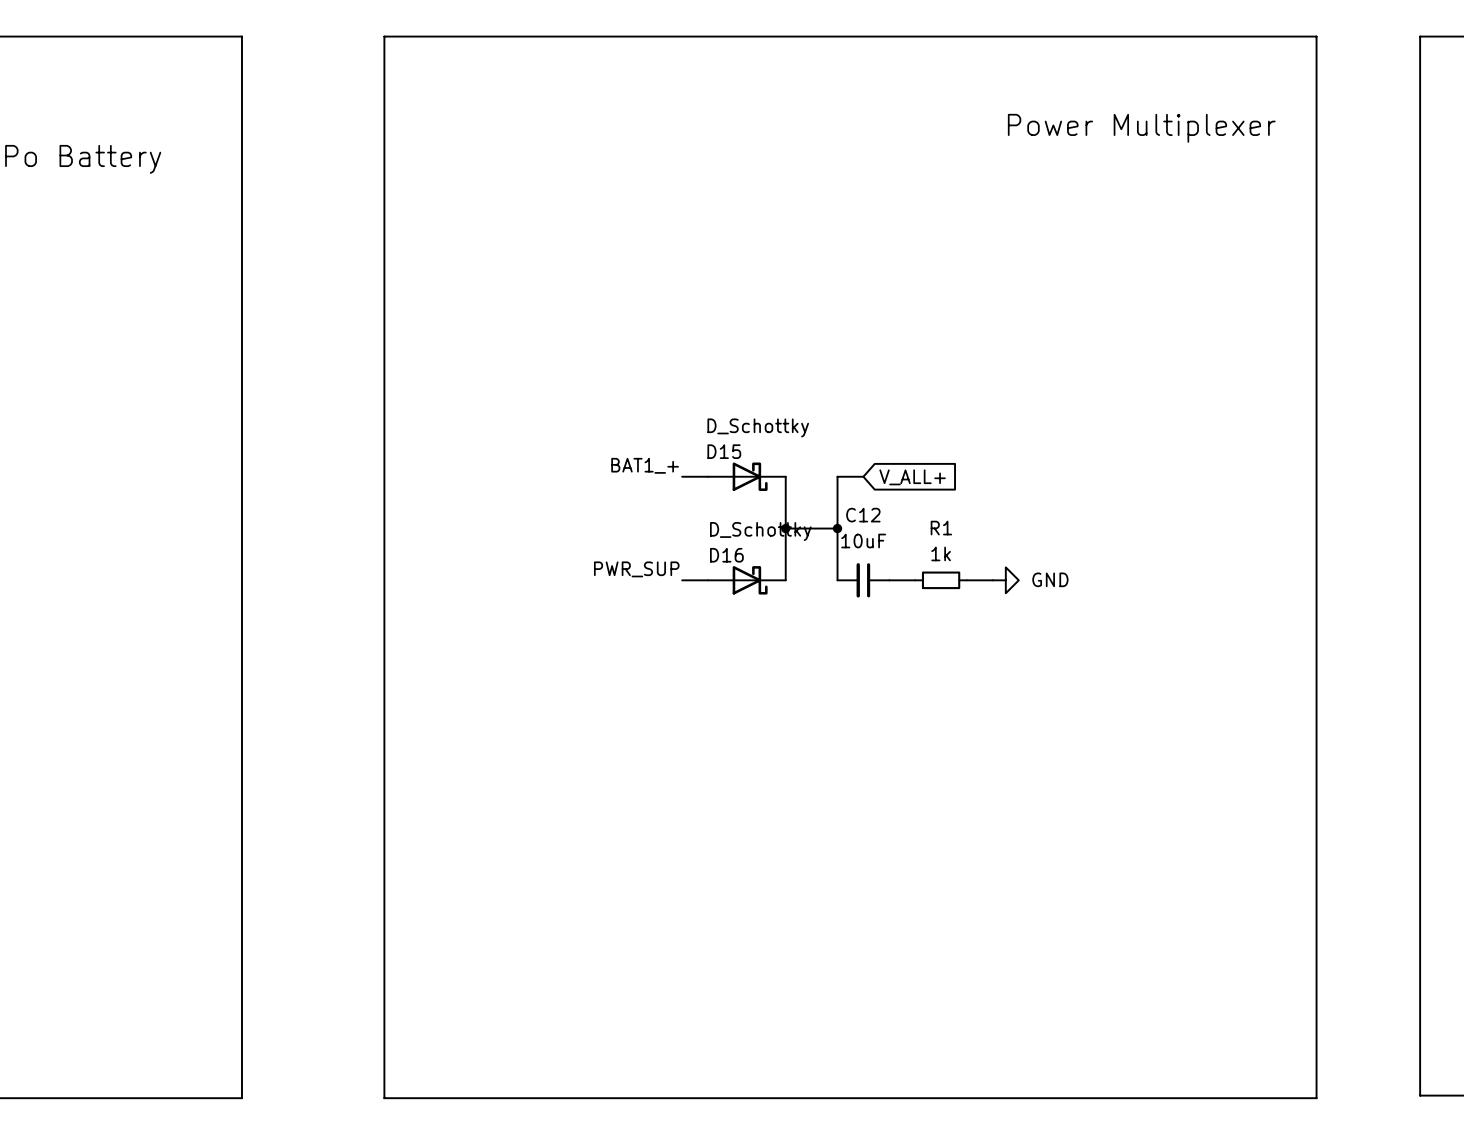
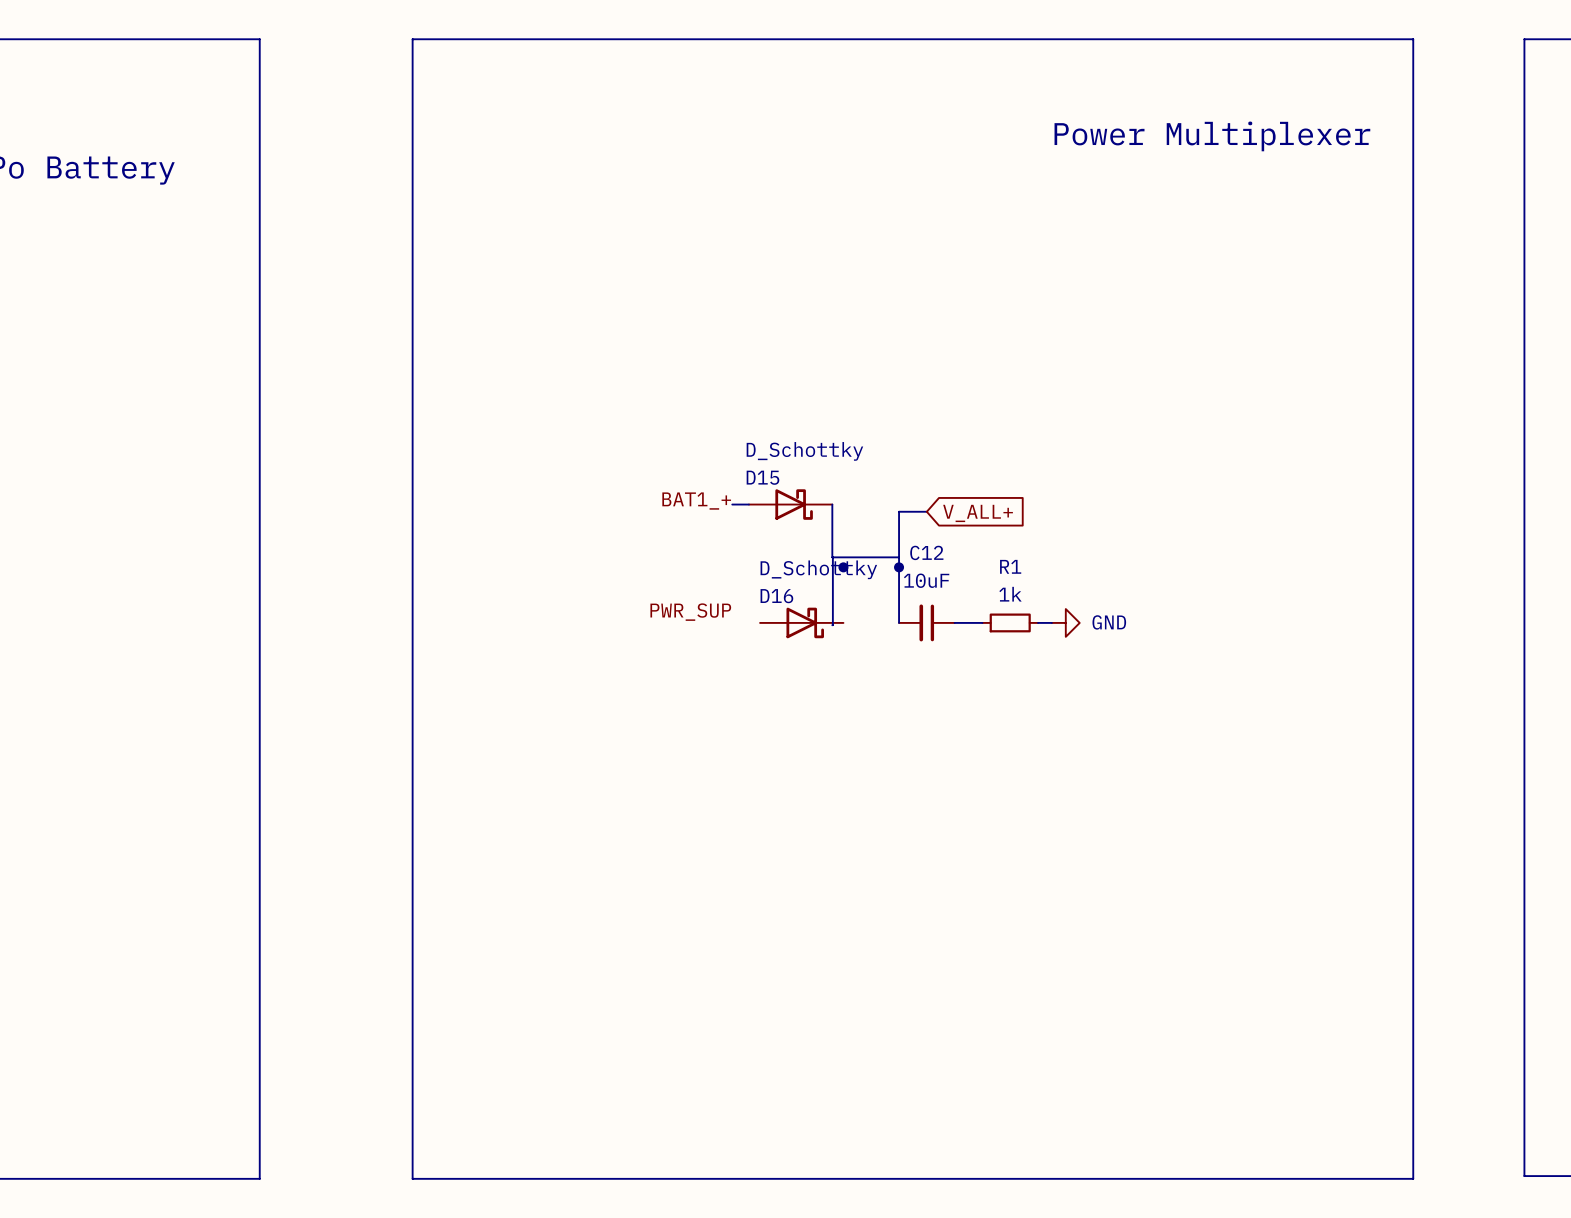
wire: none -> (732, 504) (748, 504)
wire: none -> (832, 504) (832, 557) (899, 557)
wire: (682, 476) (708, 476) -> none
D15 position: (746, 476) -> (790, 504)
wire: (785, 476) (785, 580) -> none
wire: none -> (832, 557) (832, 625)
wire: (785, 528) (837, 528) -> none
wire: (682, 580) (708, 580) -> none
power symbol position: GND (1005, 580) -> GND (1065, 622)

